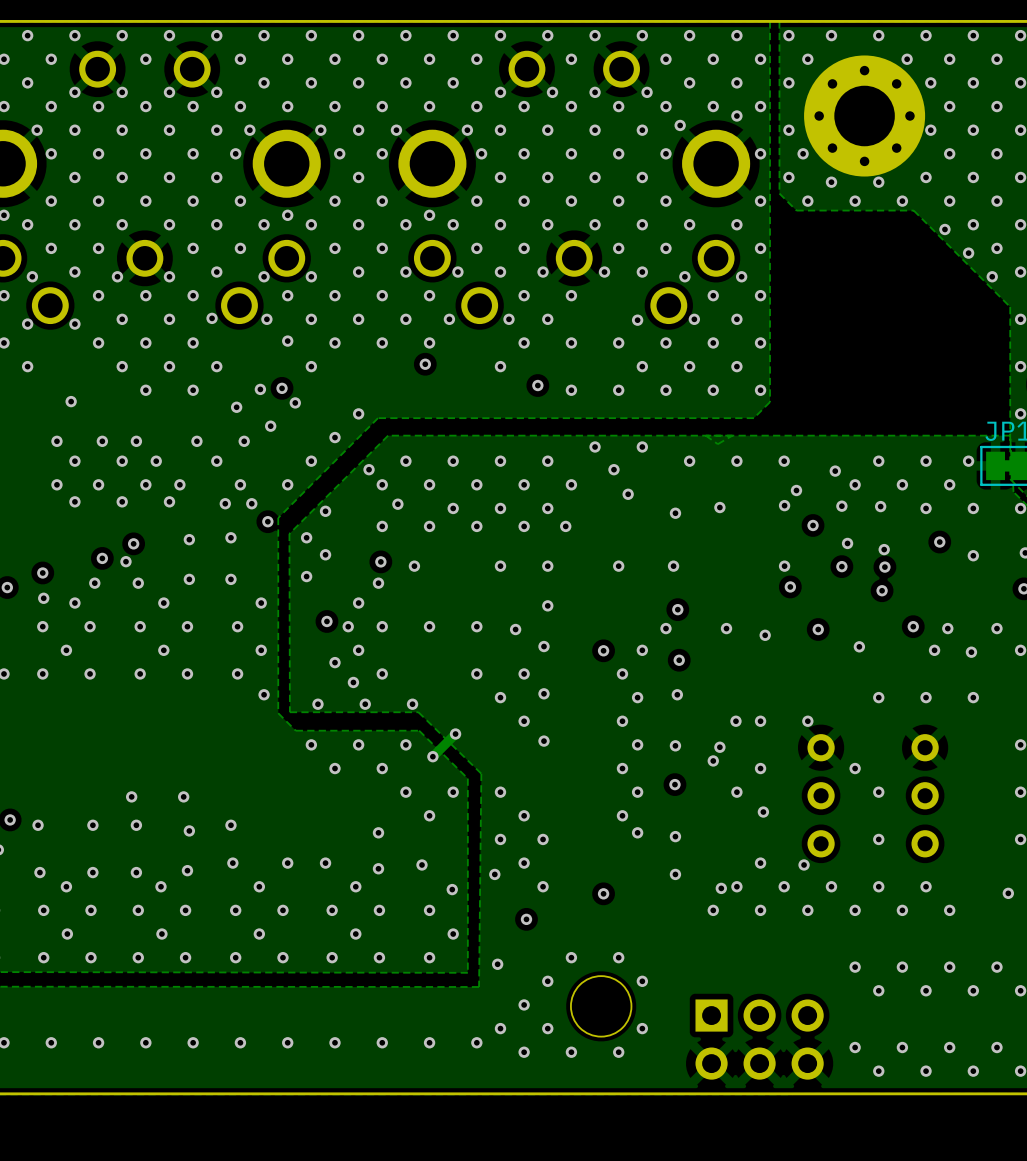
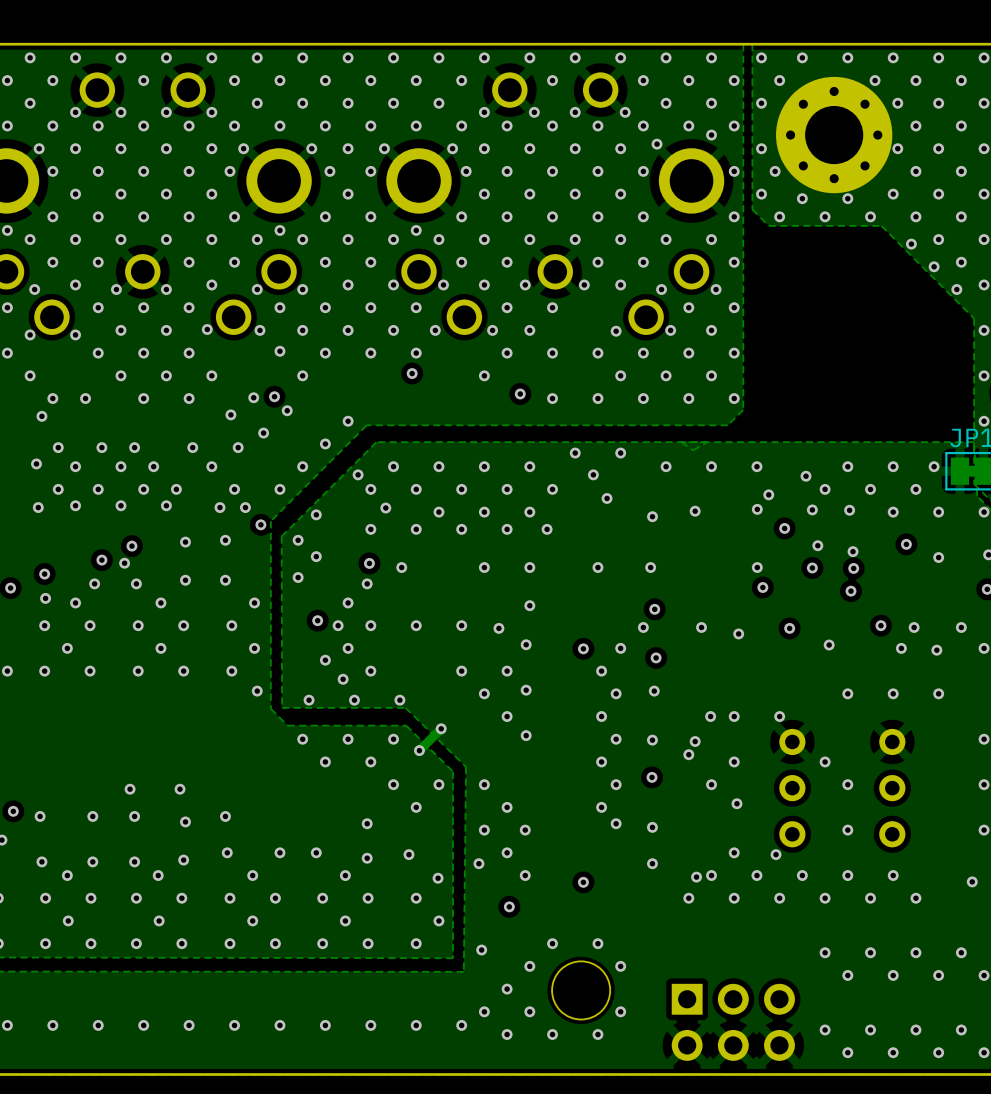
via: none -> (52, 398)
via: none -> (85, 398)
via: (71, 401) -> none
via: none -> (41, 416)
via: none -> (36, 463)
via: none -> (38, 507)

